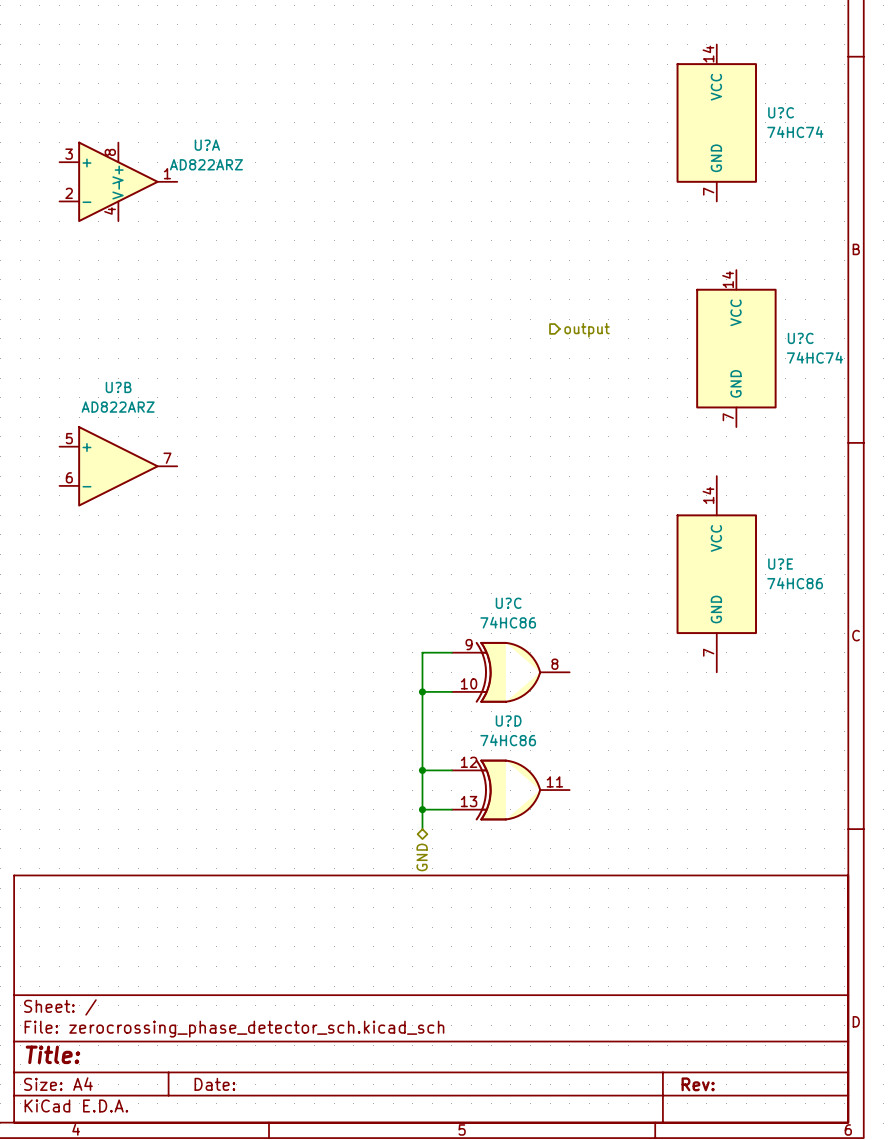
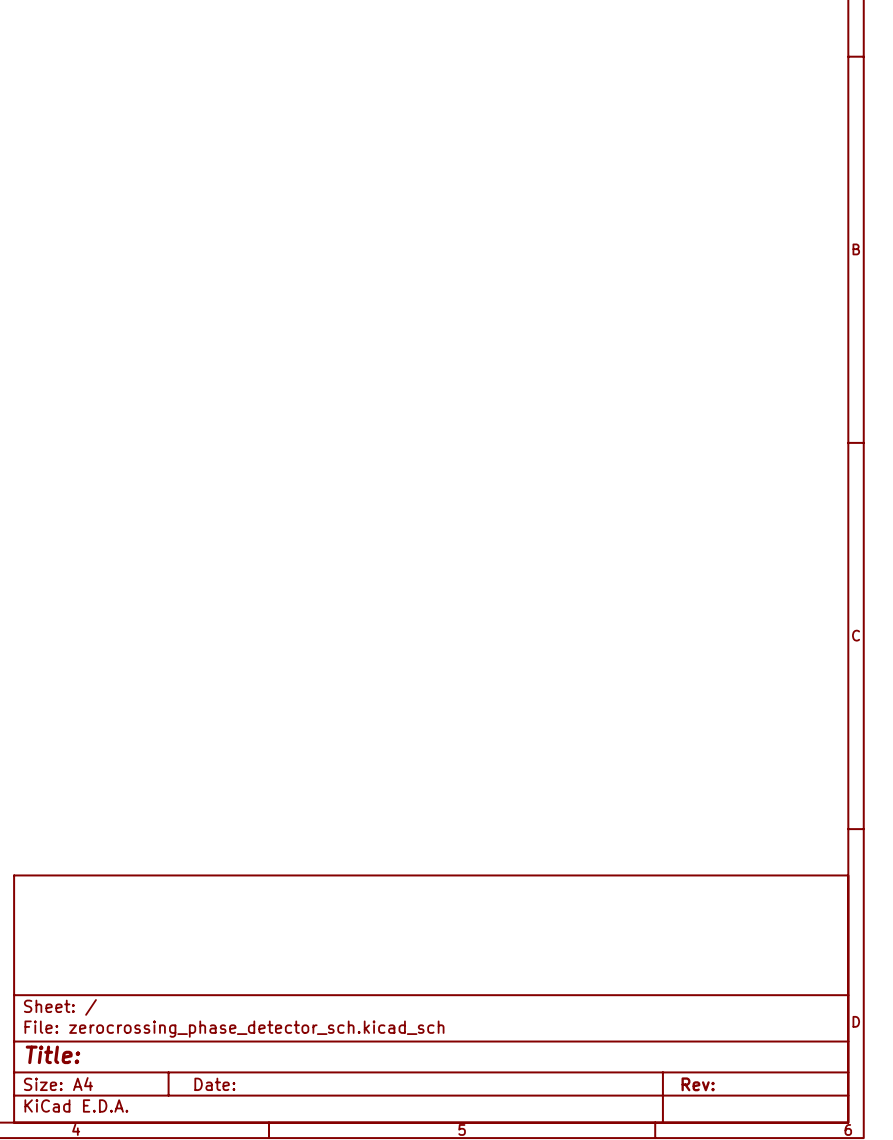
U?C: 74HC74 (716, 122) -> none
U?A: AD822ARZ (118, 181) -> none
hierarchical label: output (587, 330) -> none
U?C: 74HC74 (736, 348) -> none
U?B: AD822ARZ (118, 466) -> none
U?E: 74HC86 (716, 574) -> none
wire: (451, 652) (422, 652) (422, 829) -> none
U?C: 74HC86 (510, 672) -> none
wire: (422, 691) (451, 691) -> none
junction: (422, 691) -> none
wire: (422, 770) (451, 770) -> none
junction: (422, 770) -> none
U?D: 74HC86 (510, 790) -> none
wire: (422, 809) (451, 809) -> none
junction: (422, 809) -> none
hierarchical label: GND (422, 857) -> none

